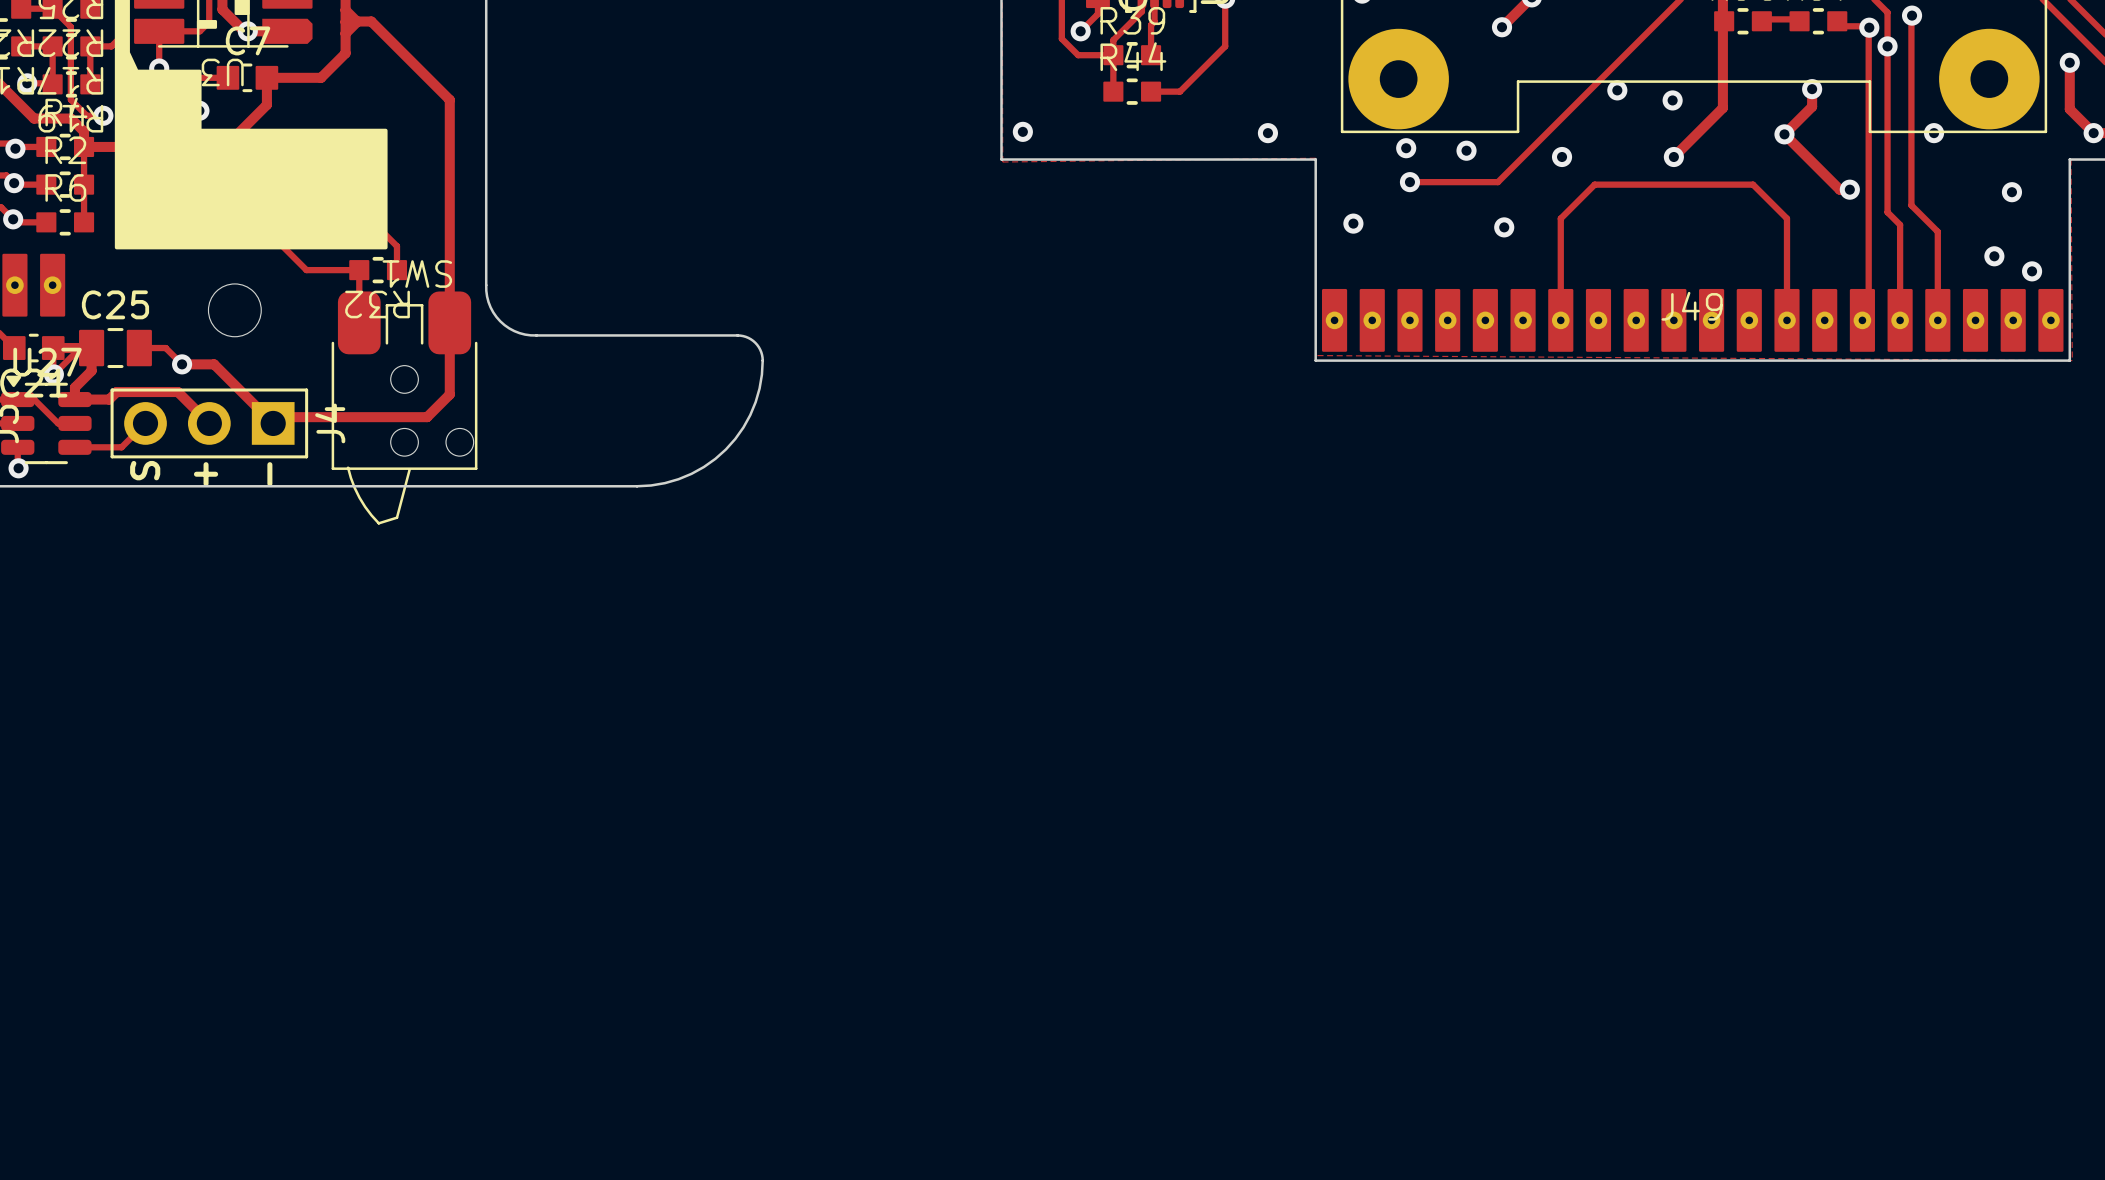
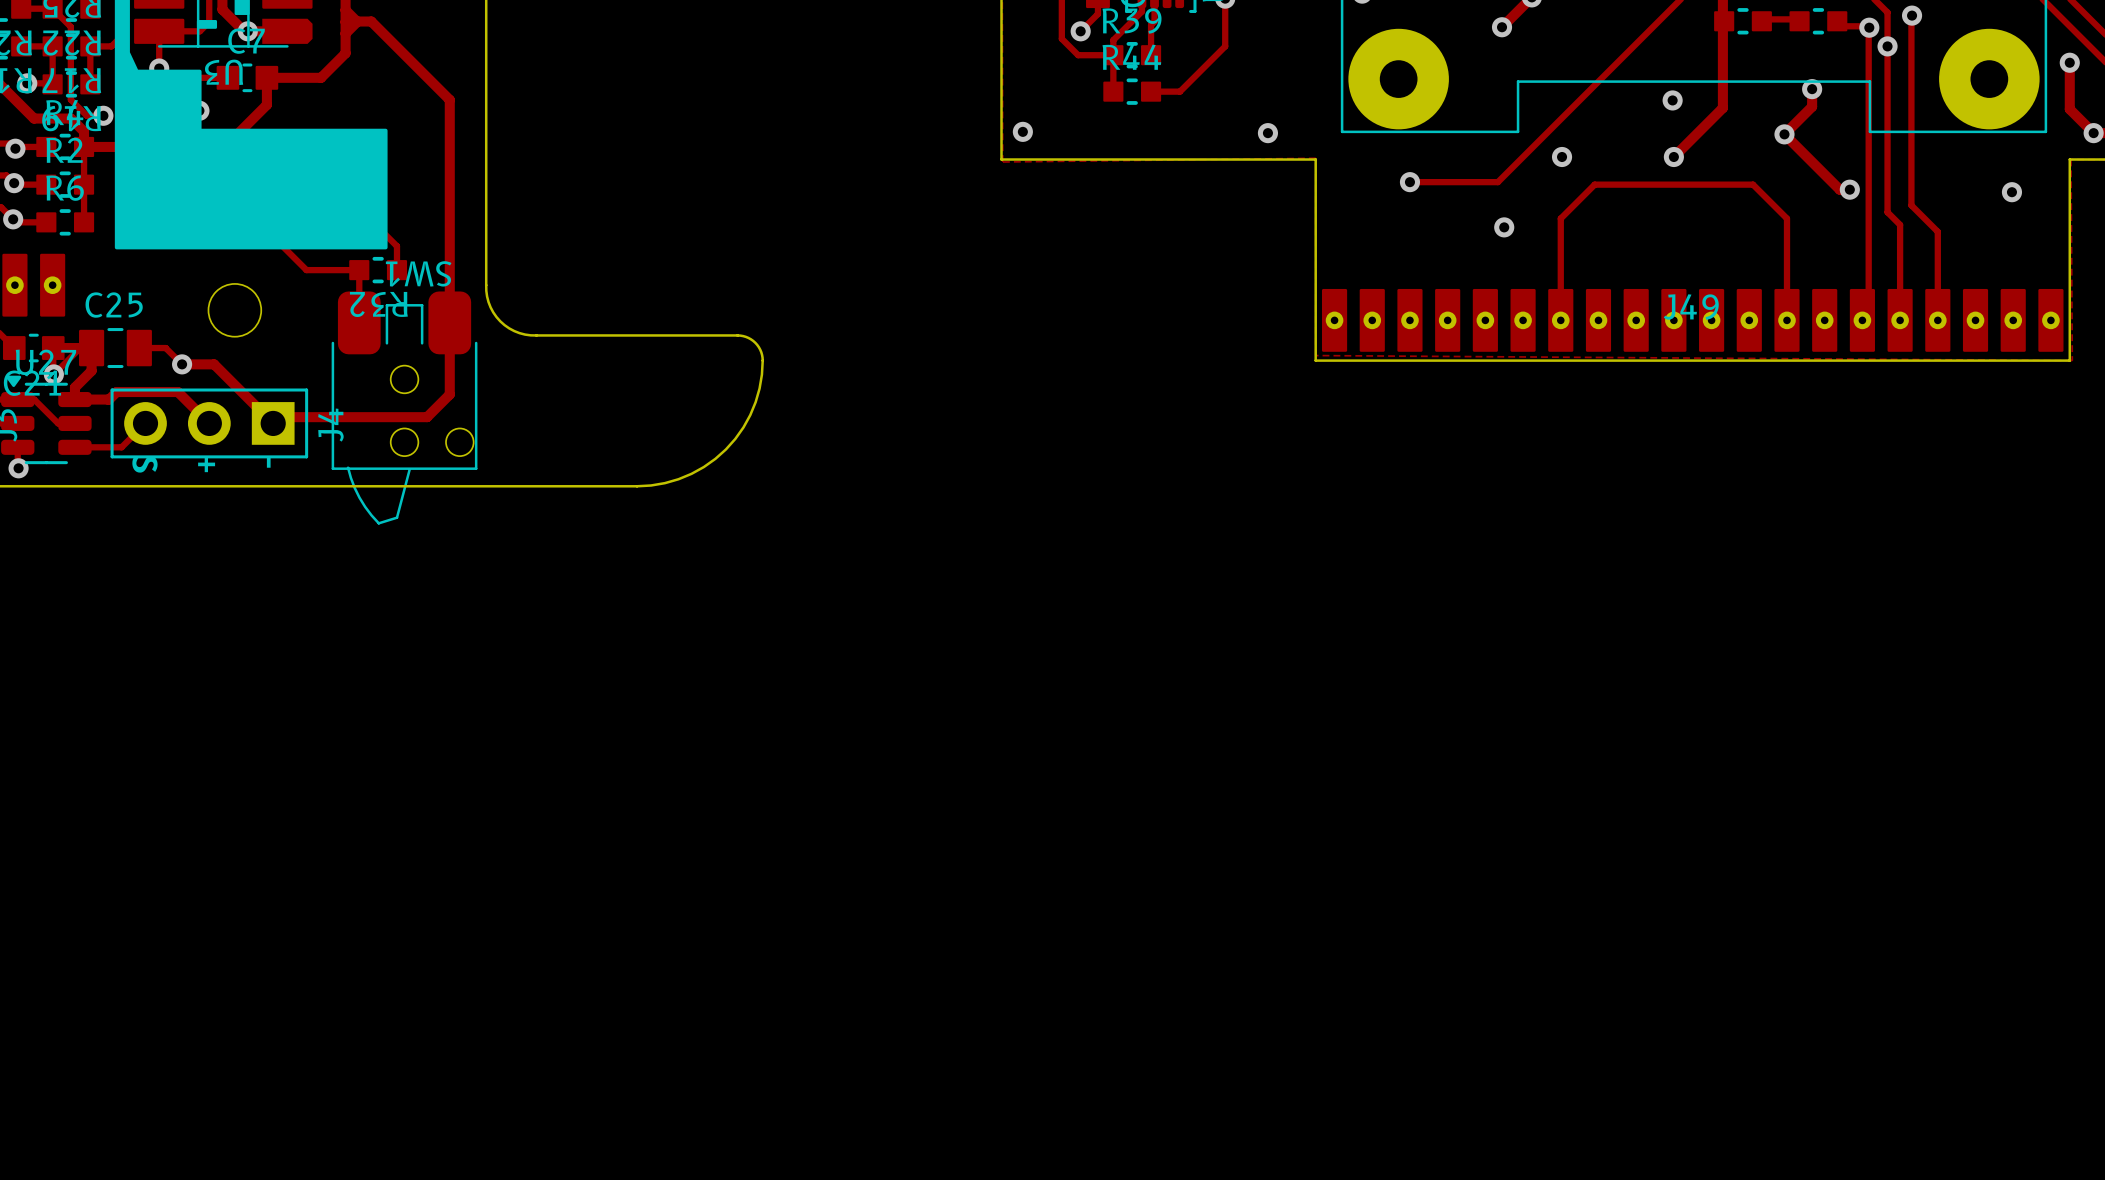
via: (1617, 90) -> none
via: (1934, 133) -> none
via: (1406, 148) -> none
via: (1466, 150) -> none
via: (1353, 223) -> none
via: (1994, 256) -> none
via: (2032, 271) -> none

